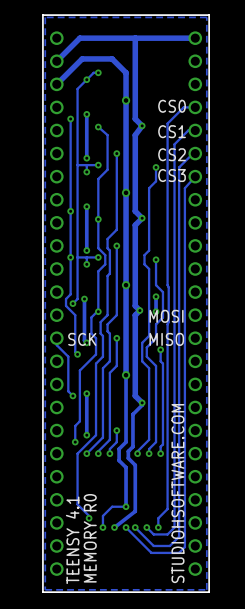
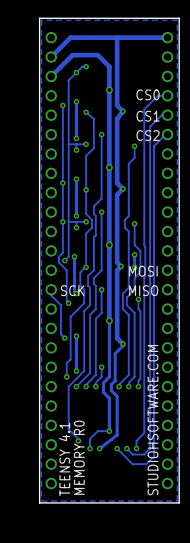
text: CS3 (172, 175) -> none
track: (195, 176) (184, 188) (184, 547) (179, 552) (151, 552) (126, 527) -> none
via: (126, 527) -> none

